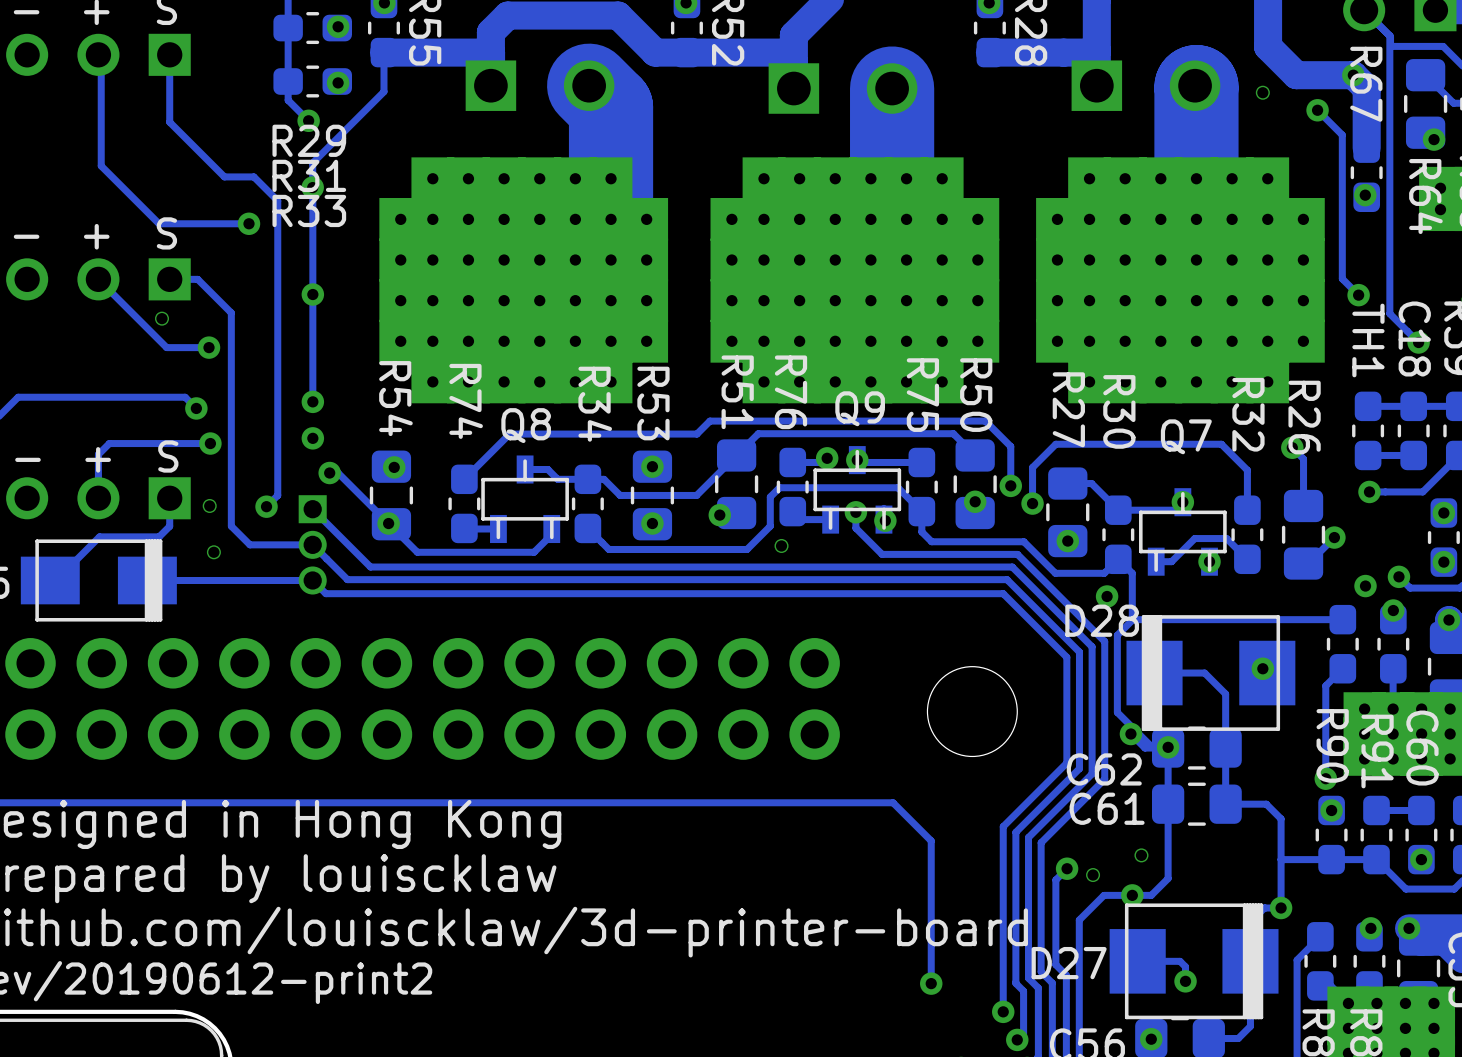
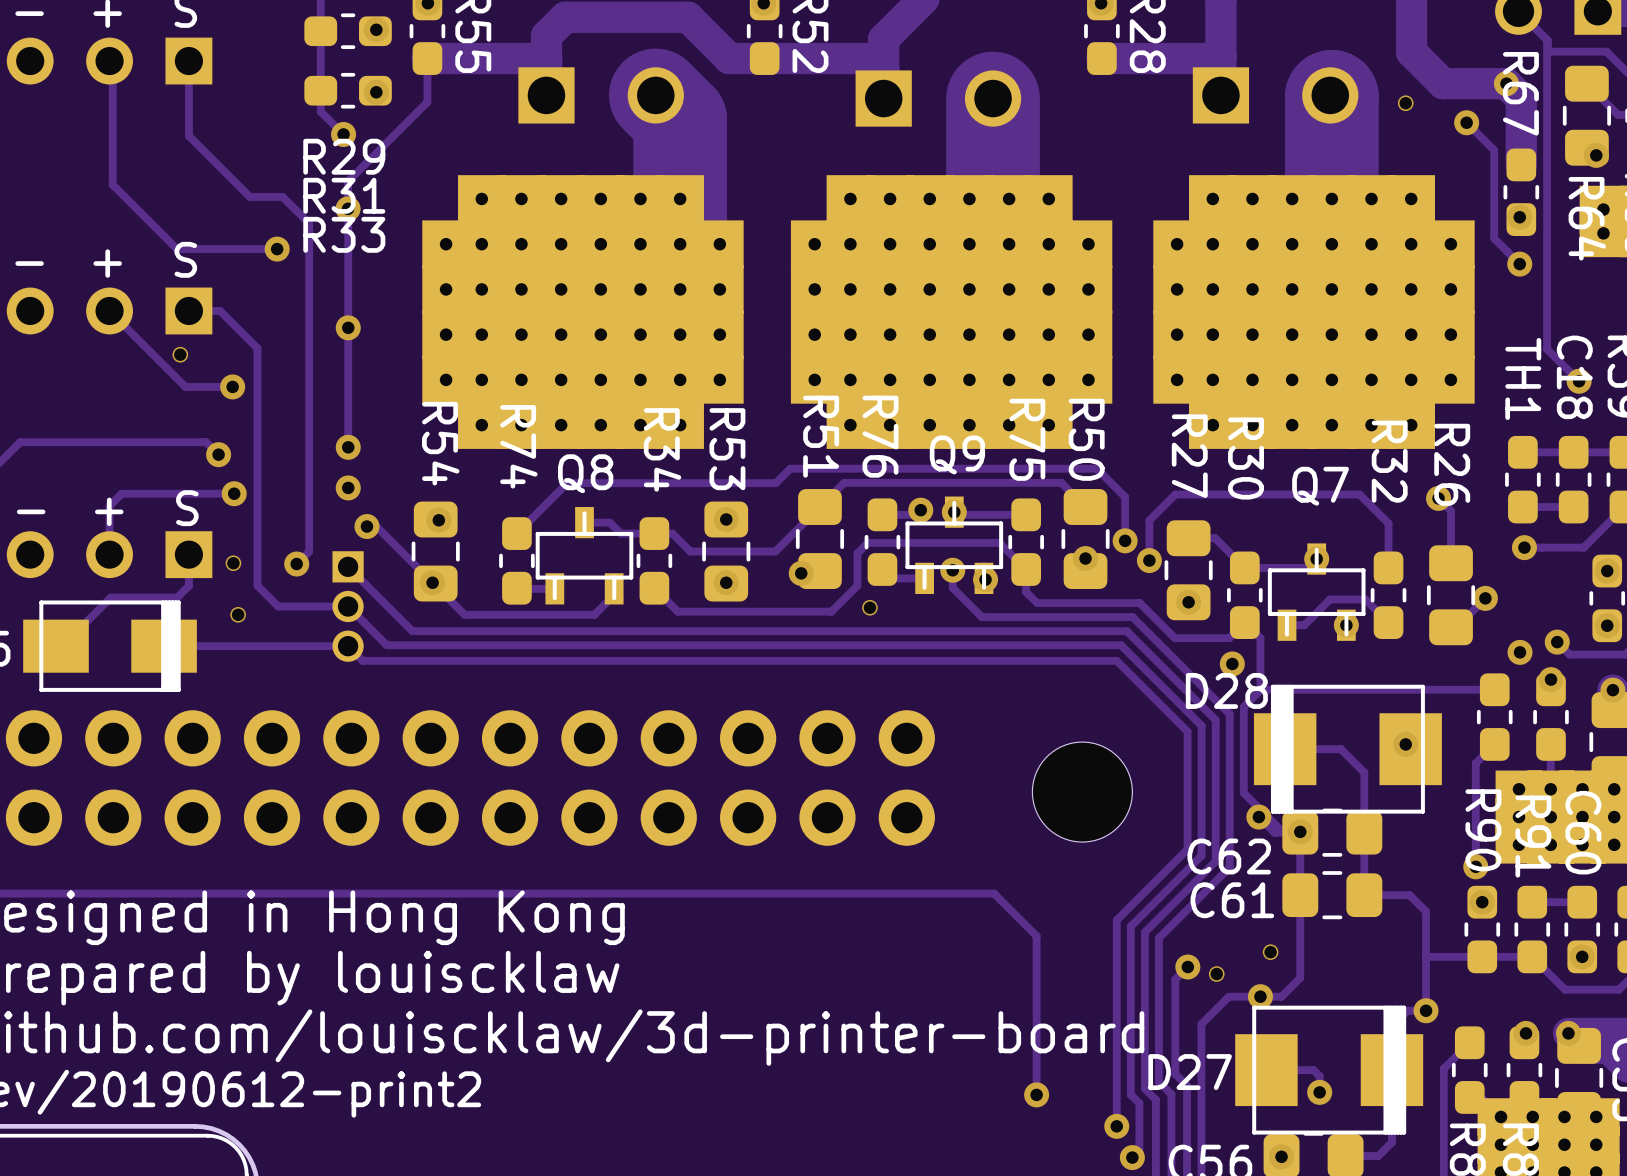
track: (1342, 214) (1342, 278) (1358, 295) -> (1494, 238) (1519, 264)
via position: (1358, 295) -> (1519, 264)

